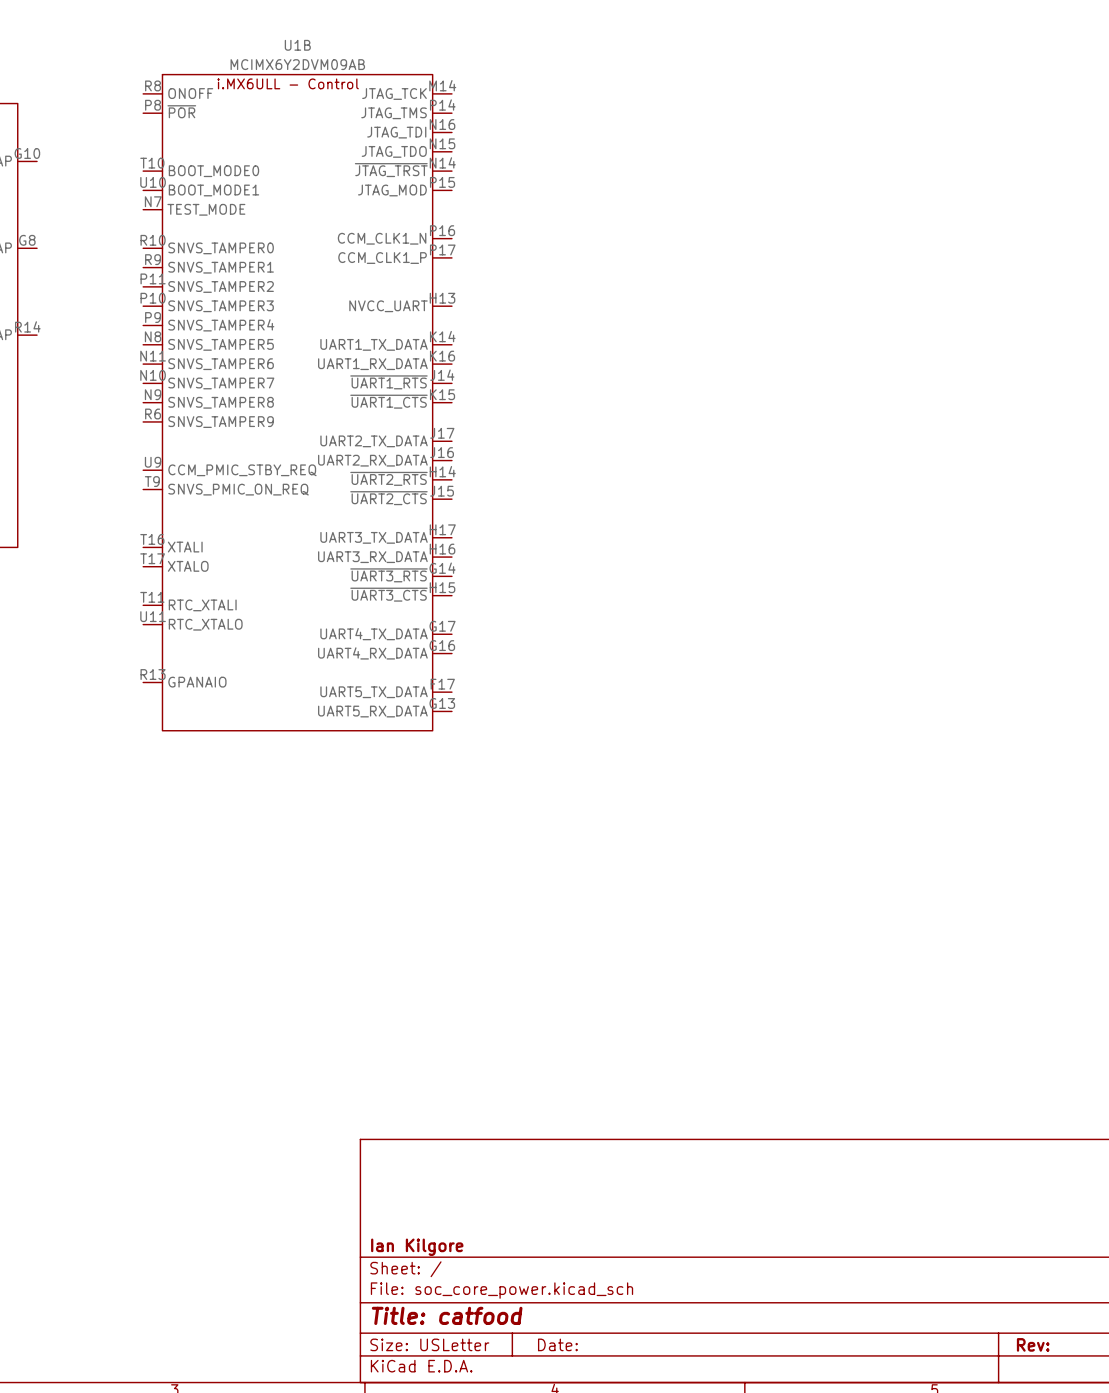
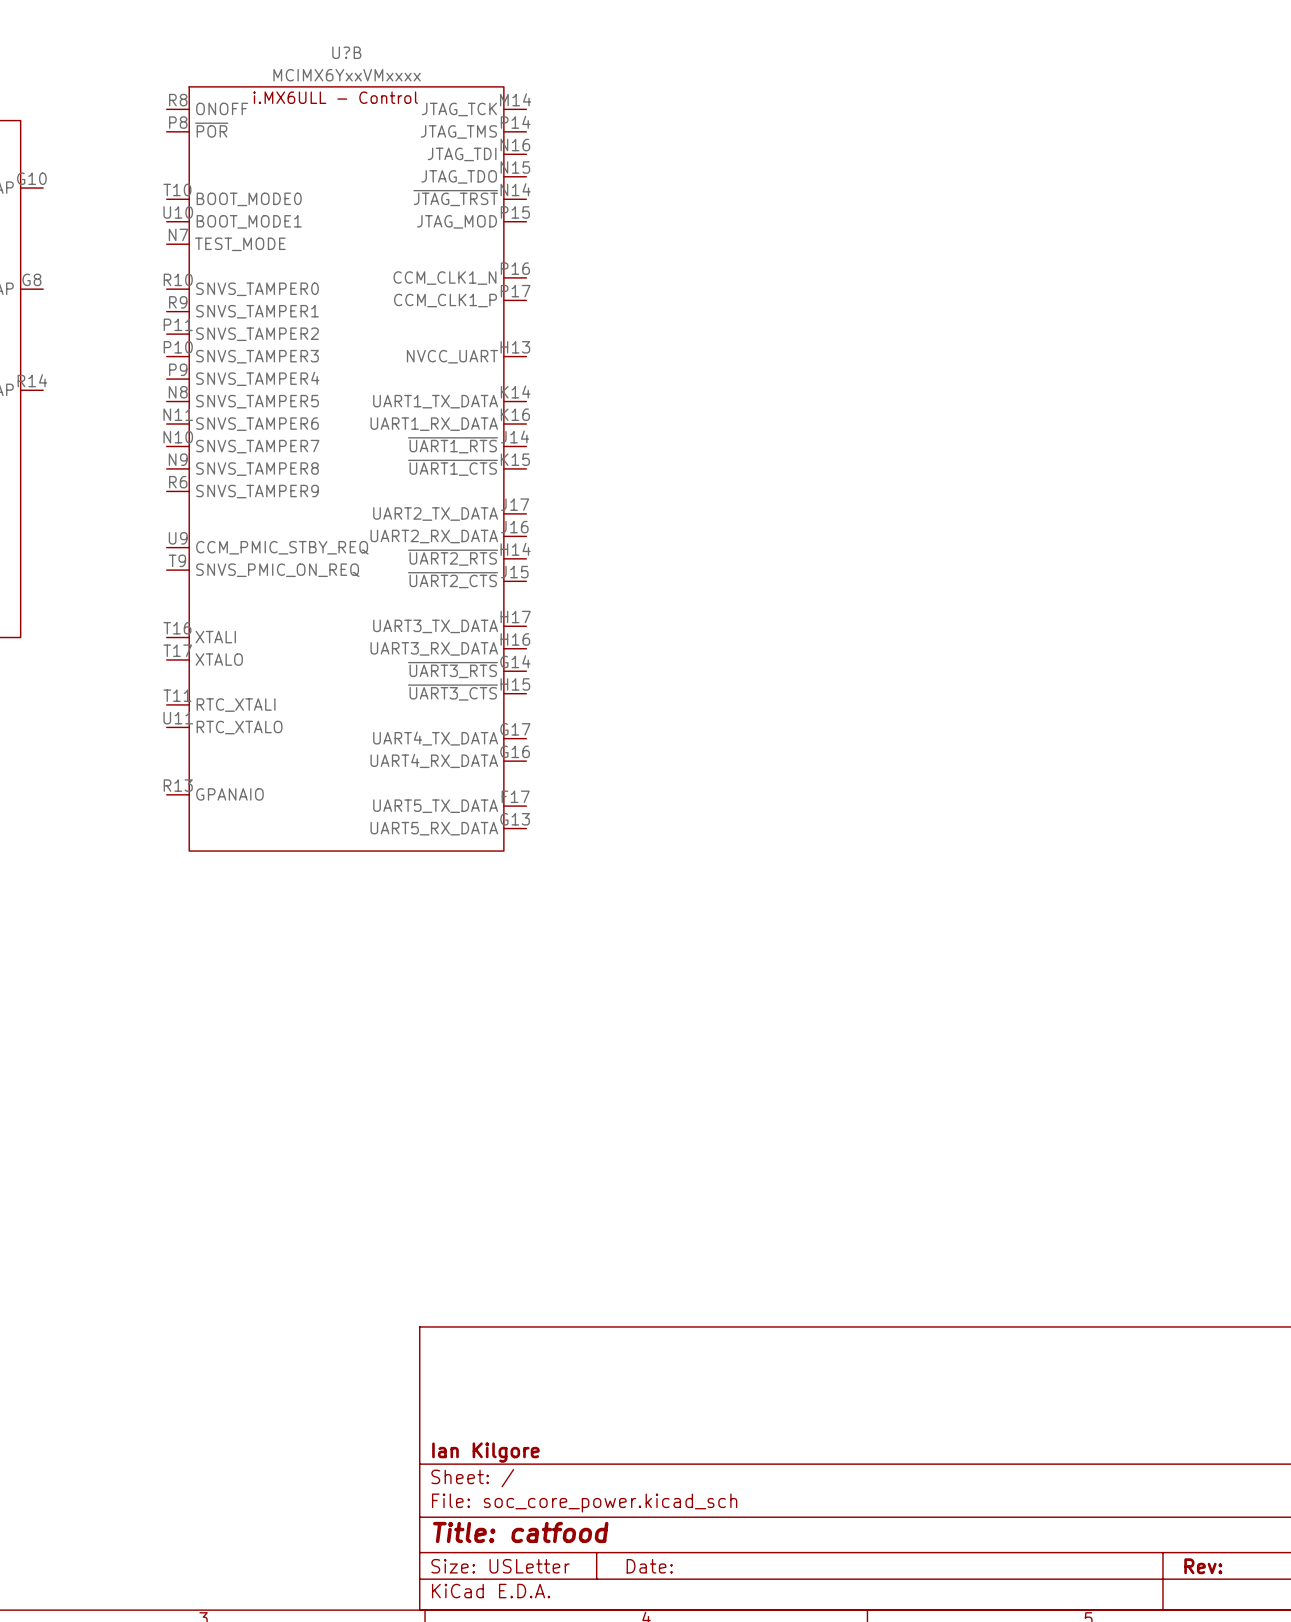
U1B name: U1B (297, 45) -> U?B (346, 52)
U1B value: MCIMX6Y2DVM09AB (297, 64) -> MCIMX6YxxVMxxxx (347, 75)

